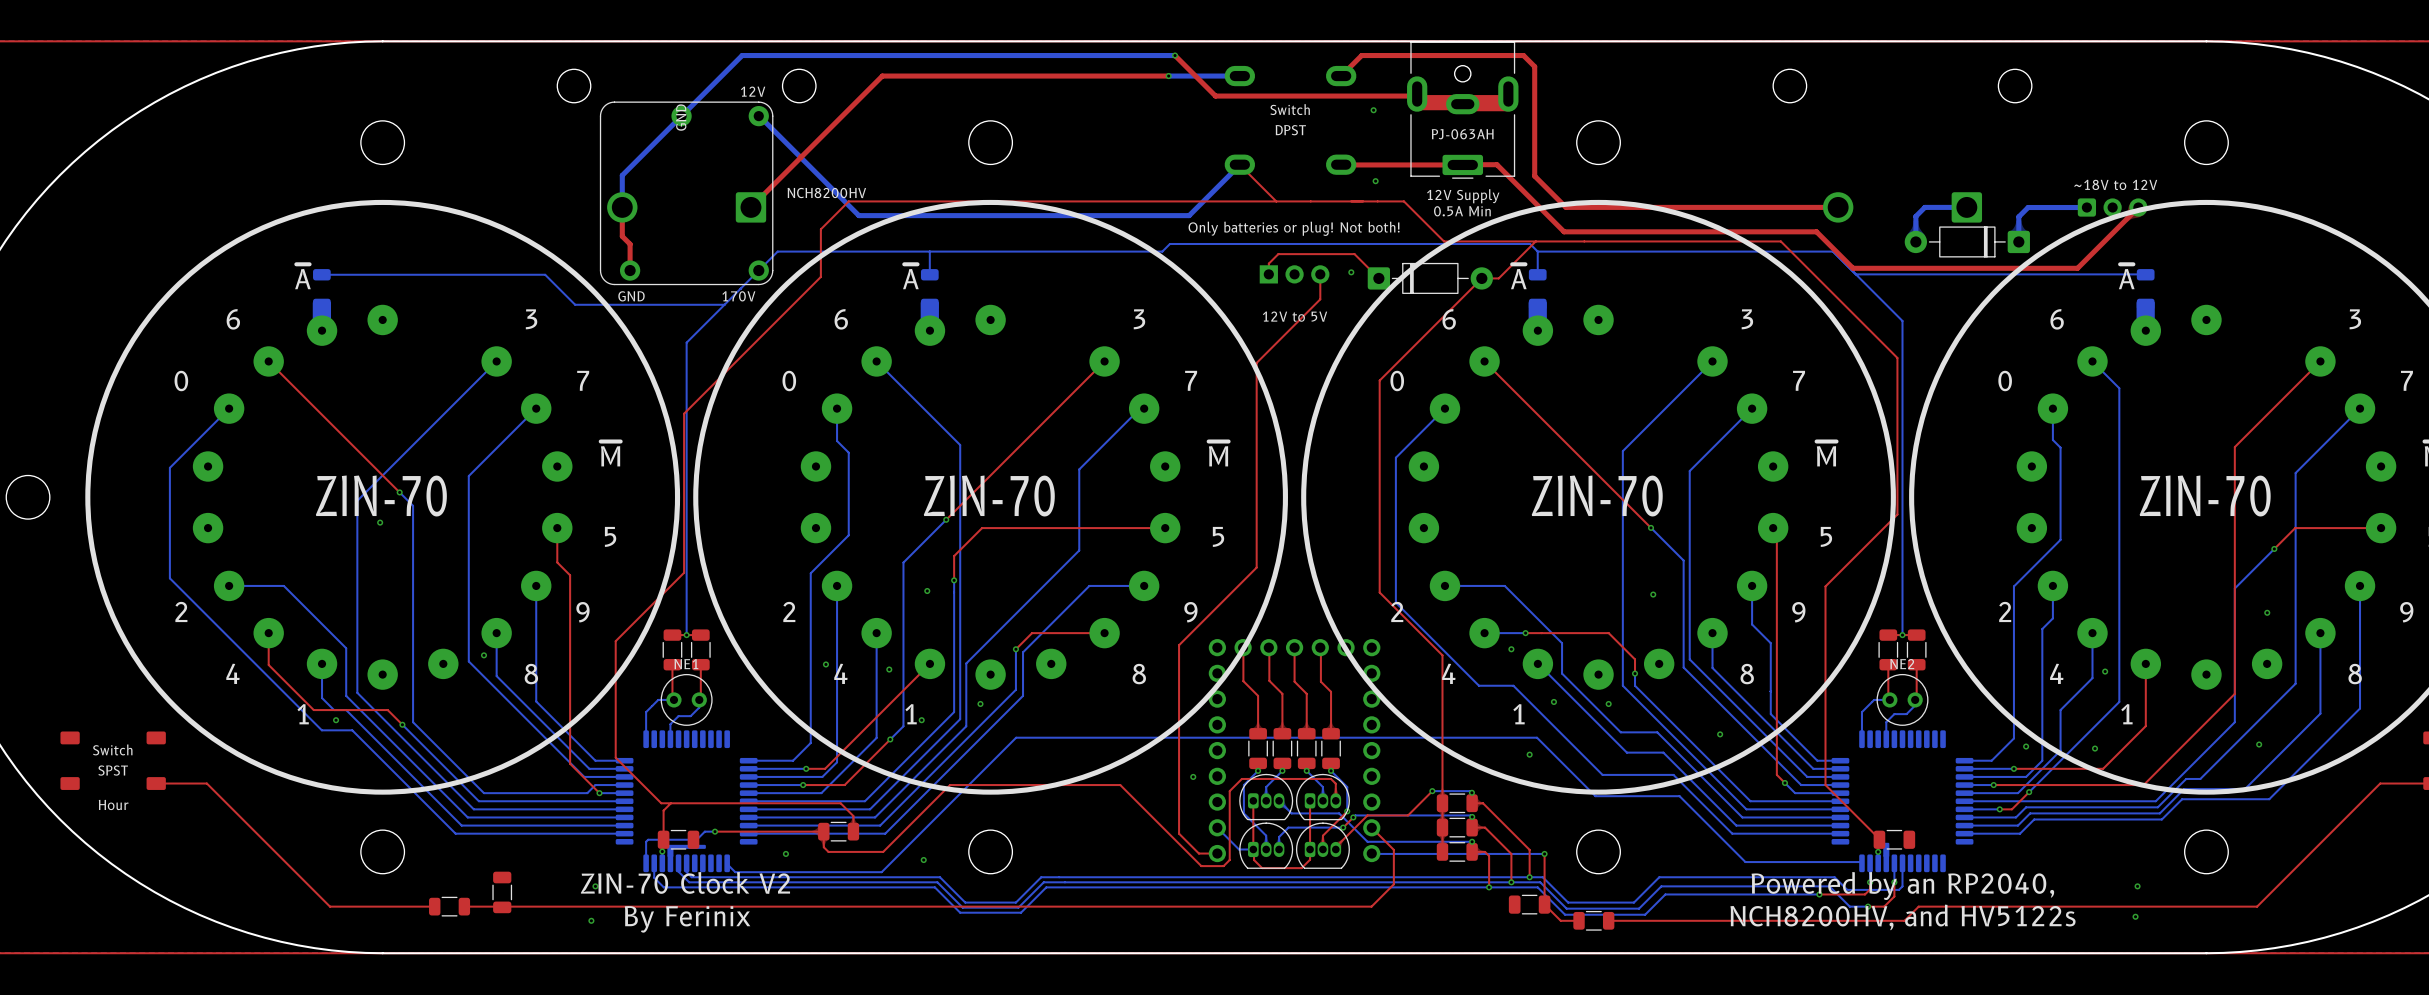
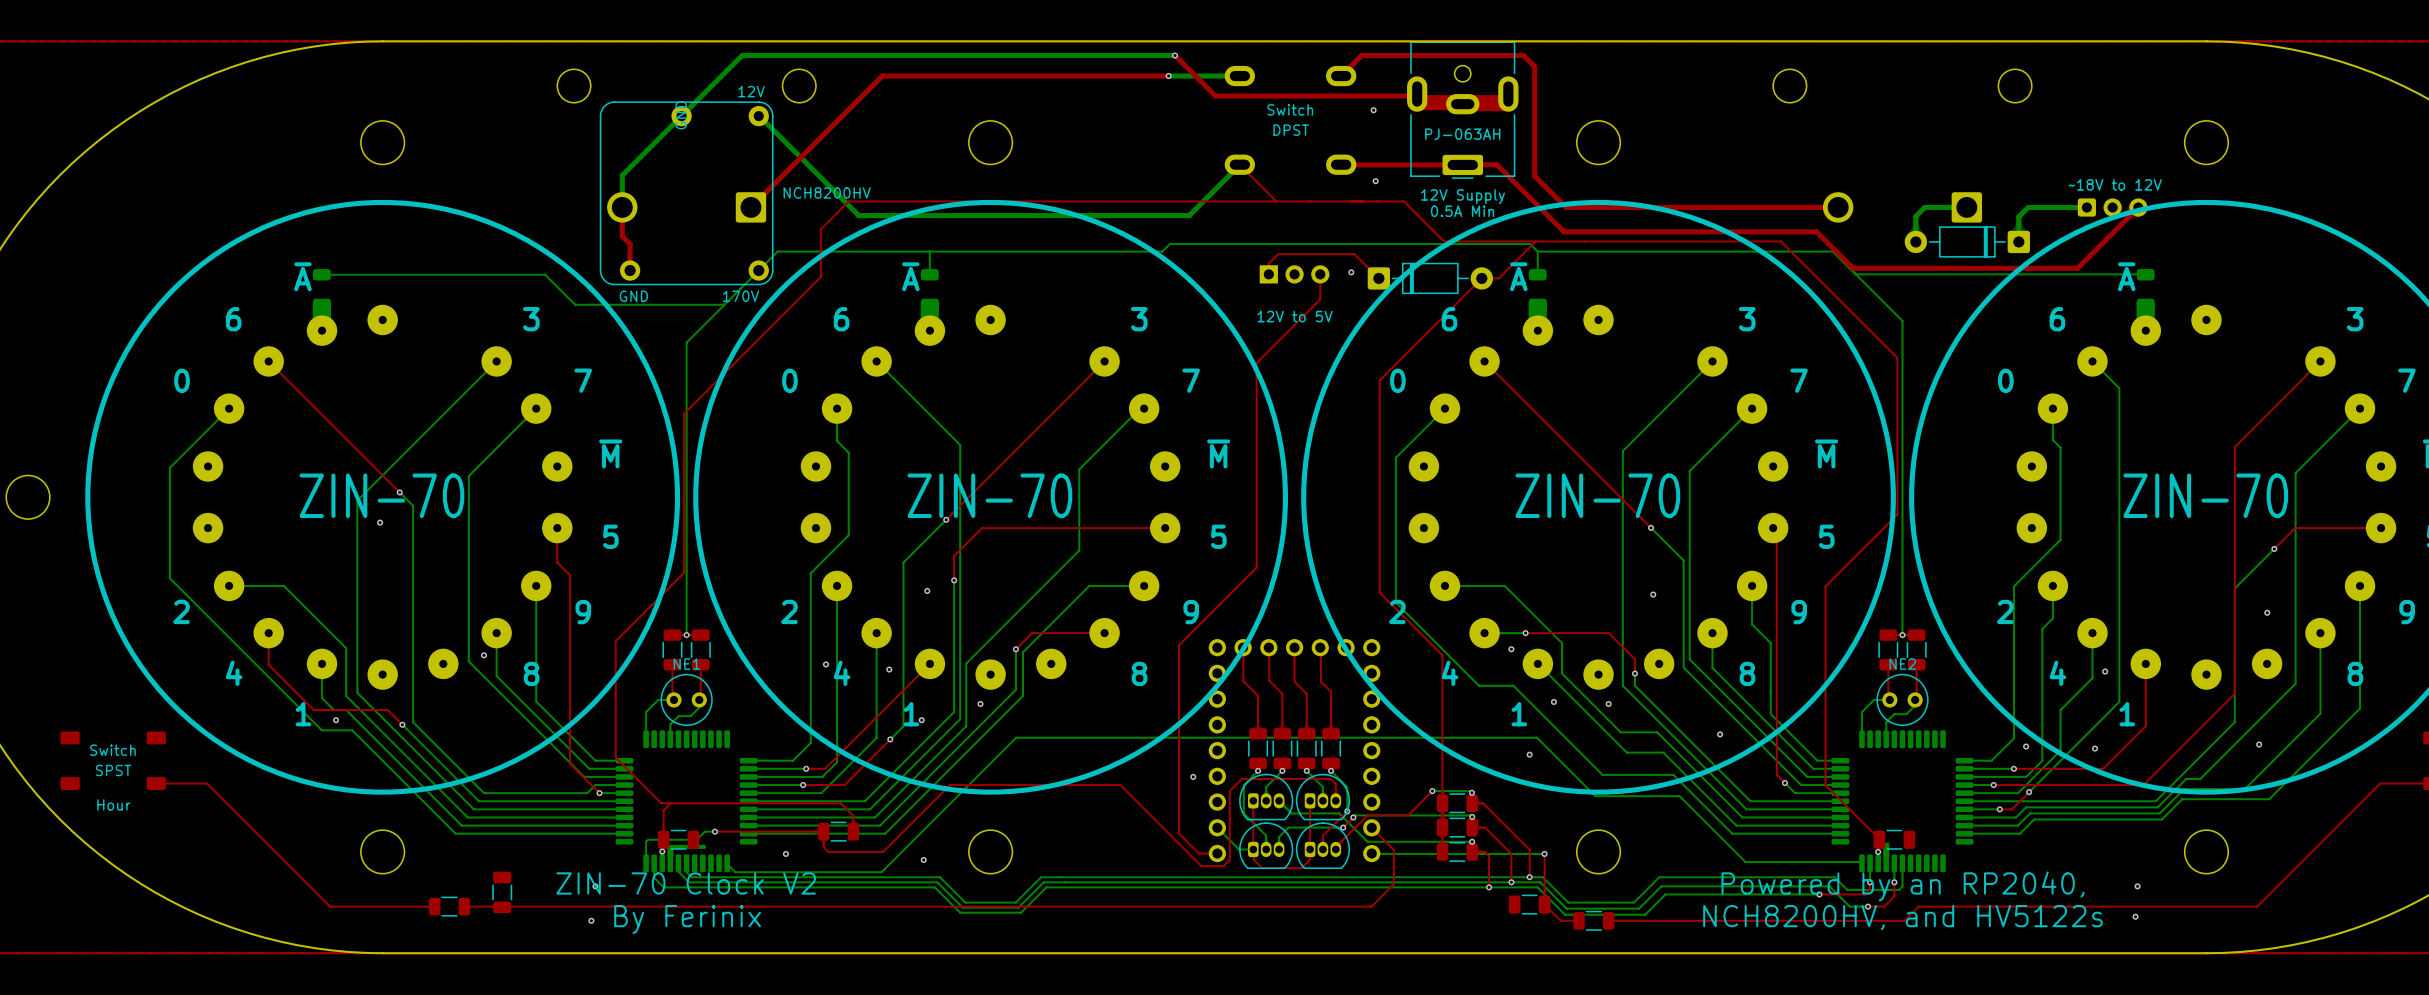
text: Only batteries or plug! Not both! (1294, 228) -> none

